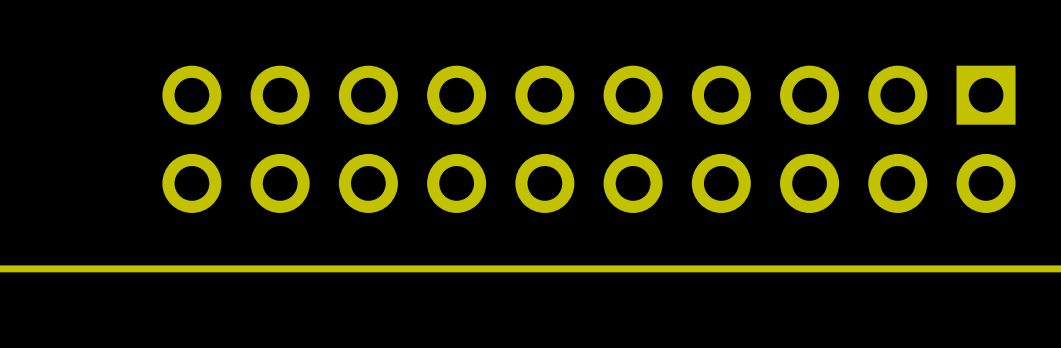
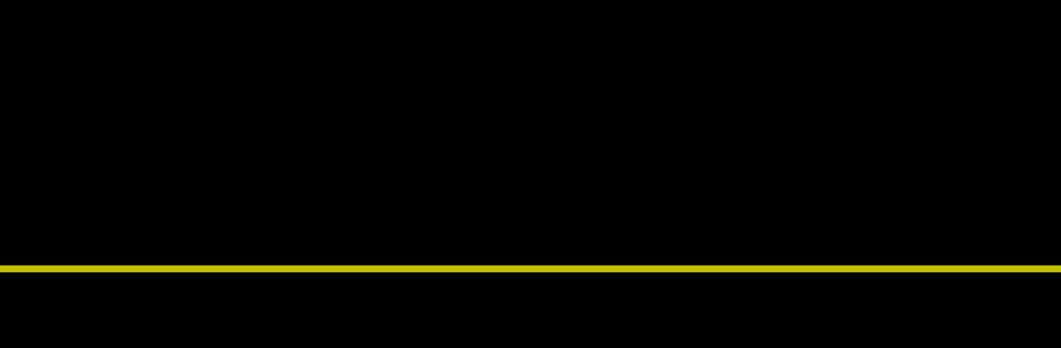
part: (588, 139) -> none

